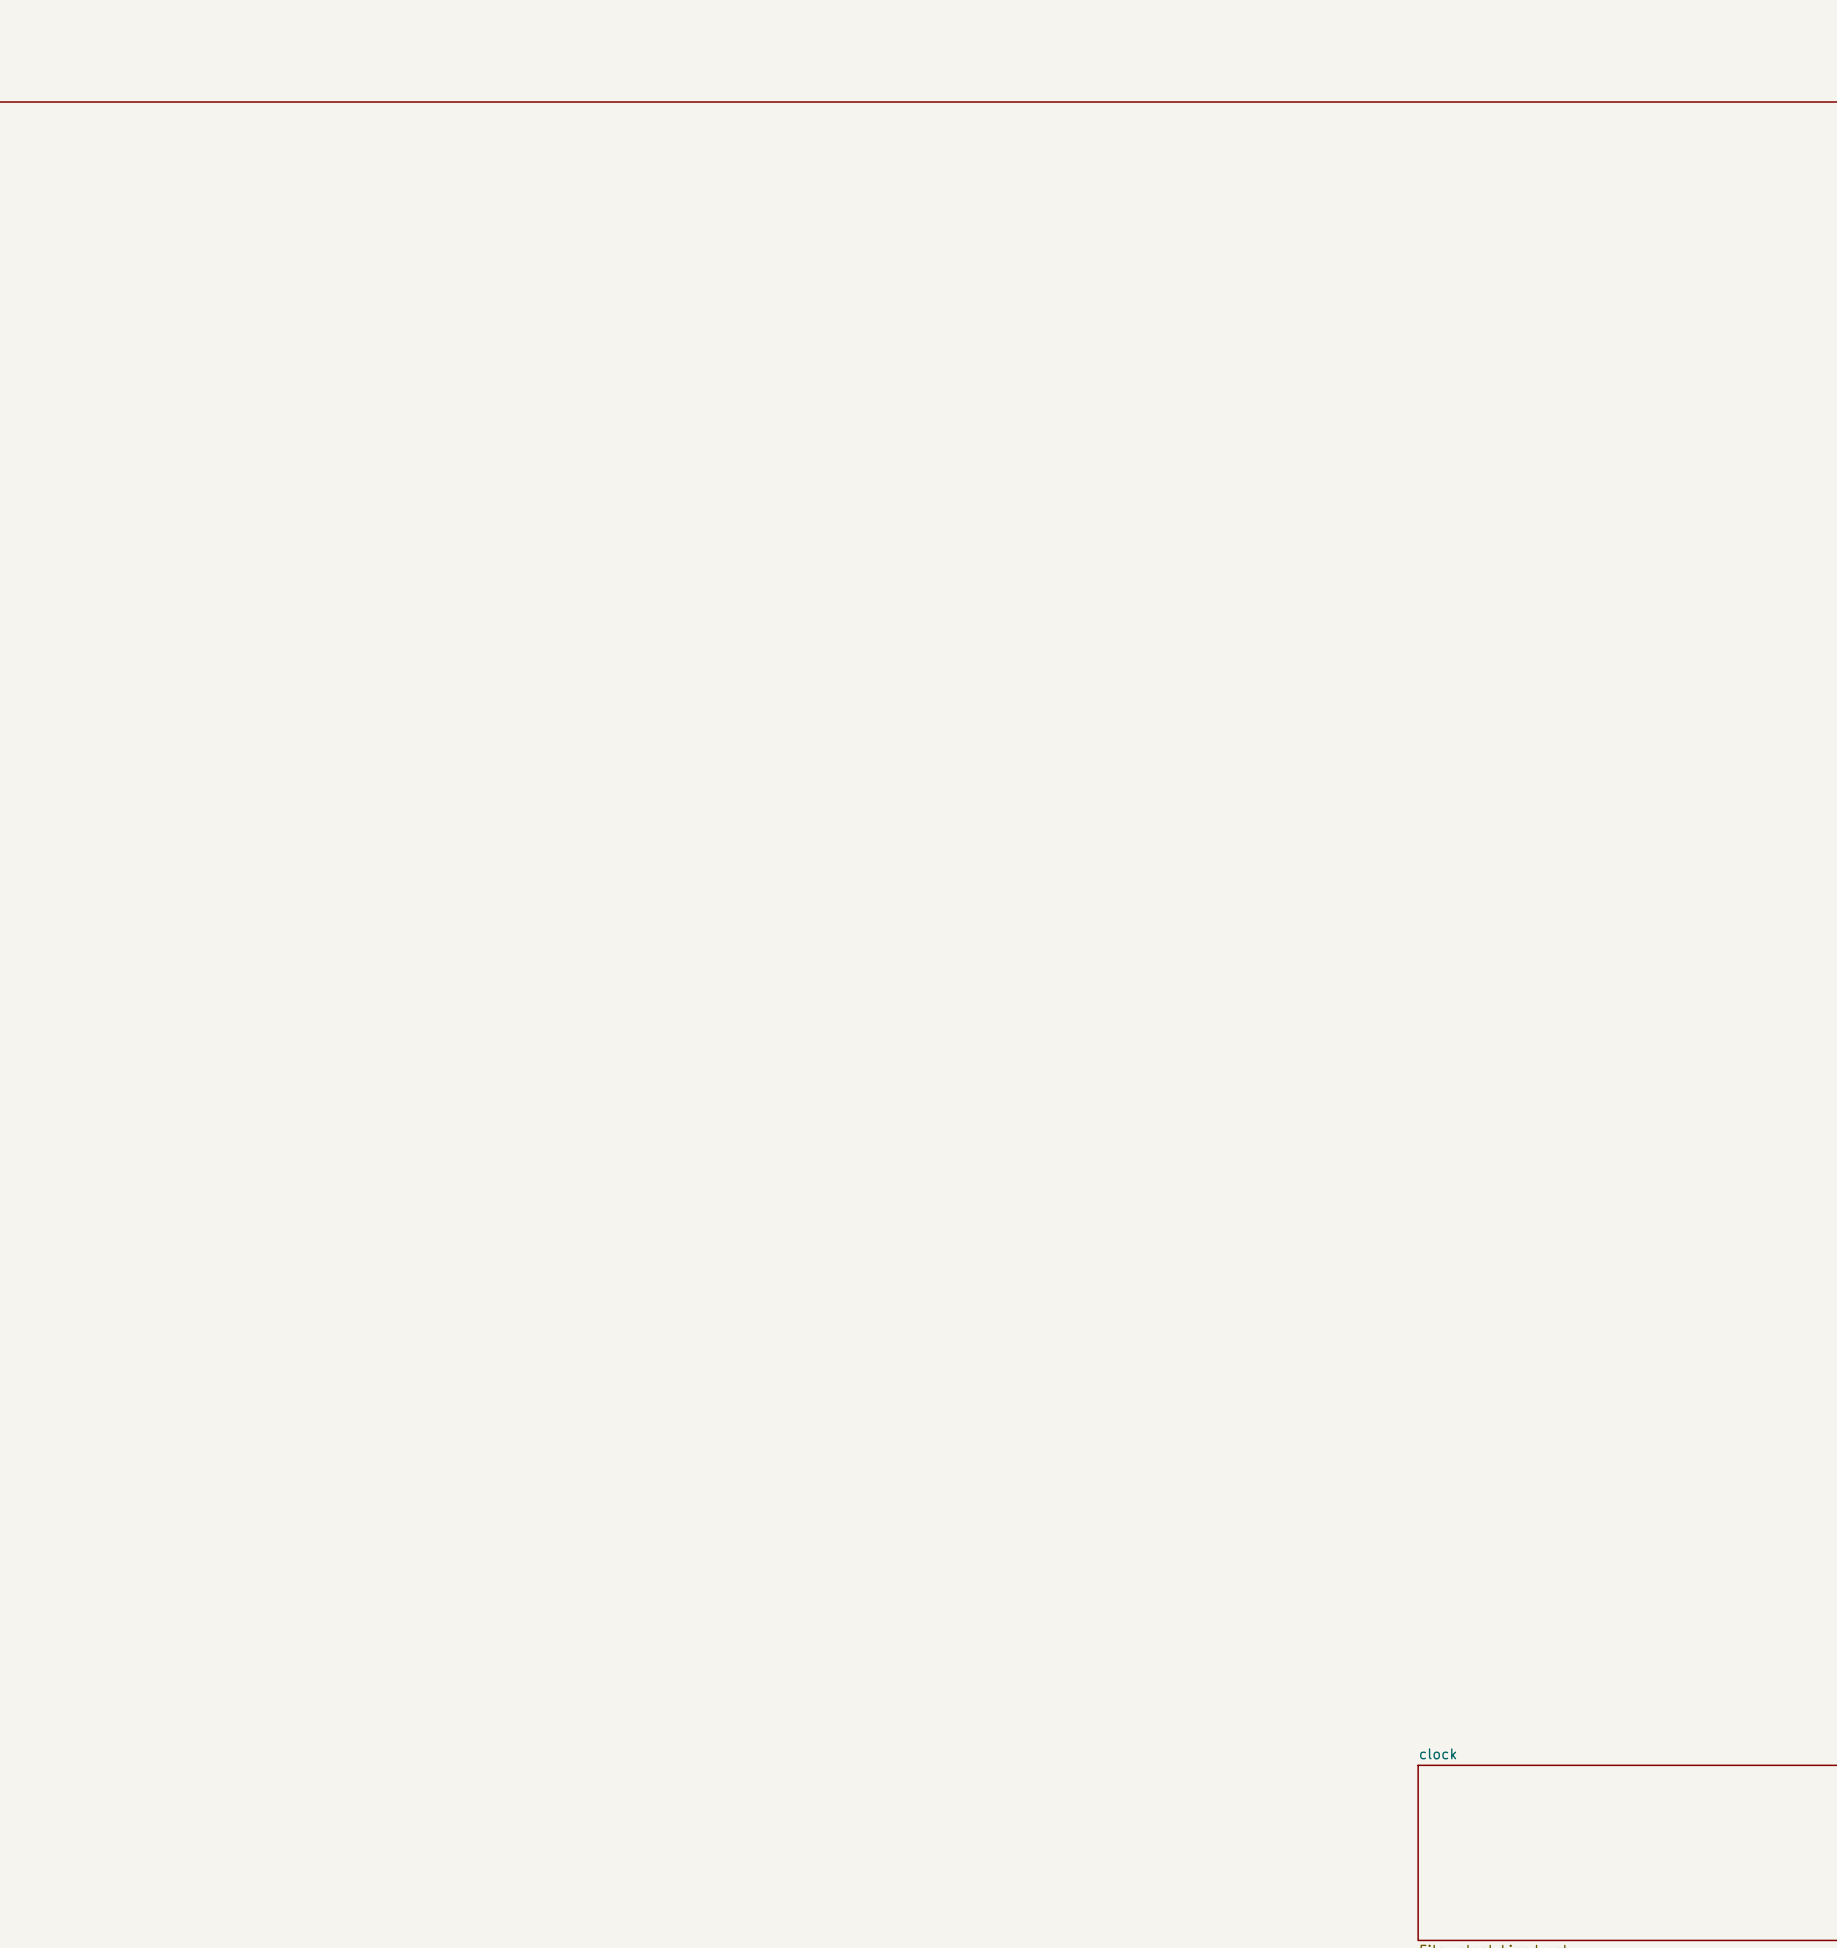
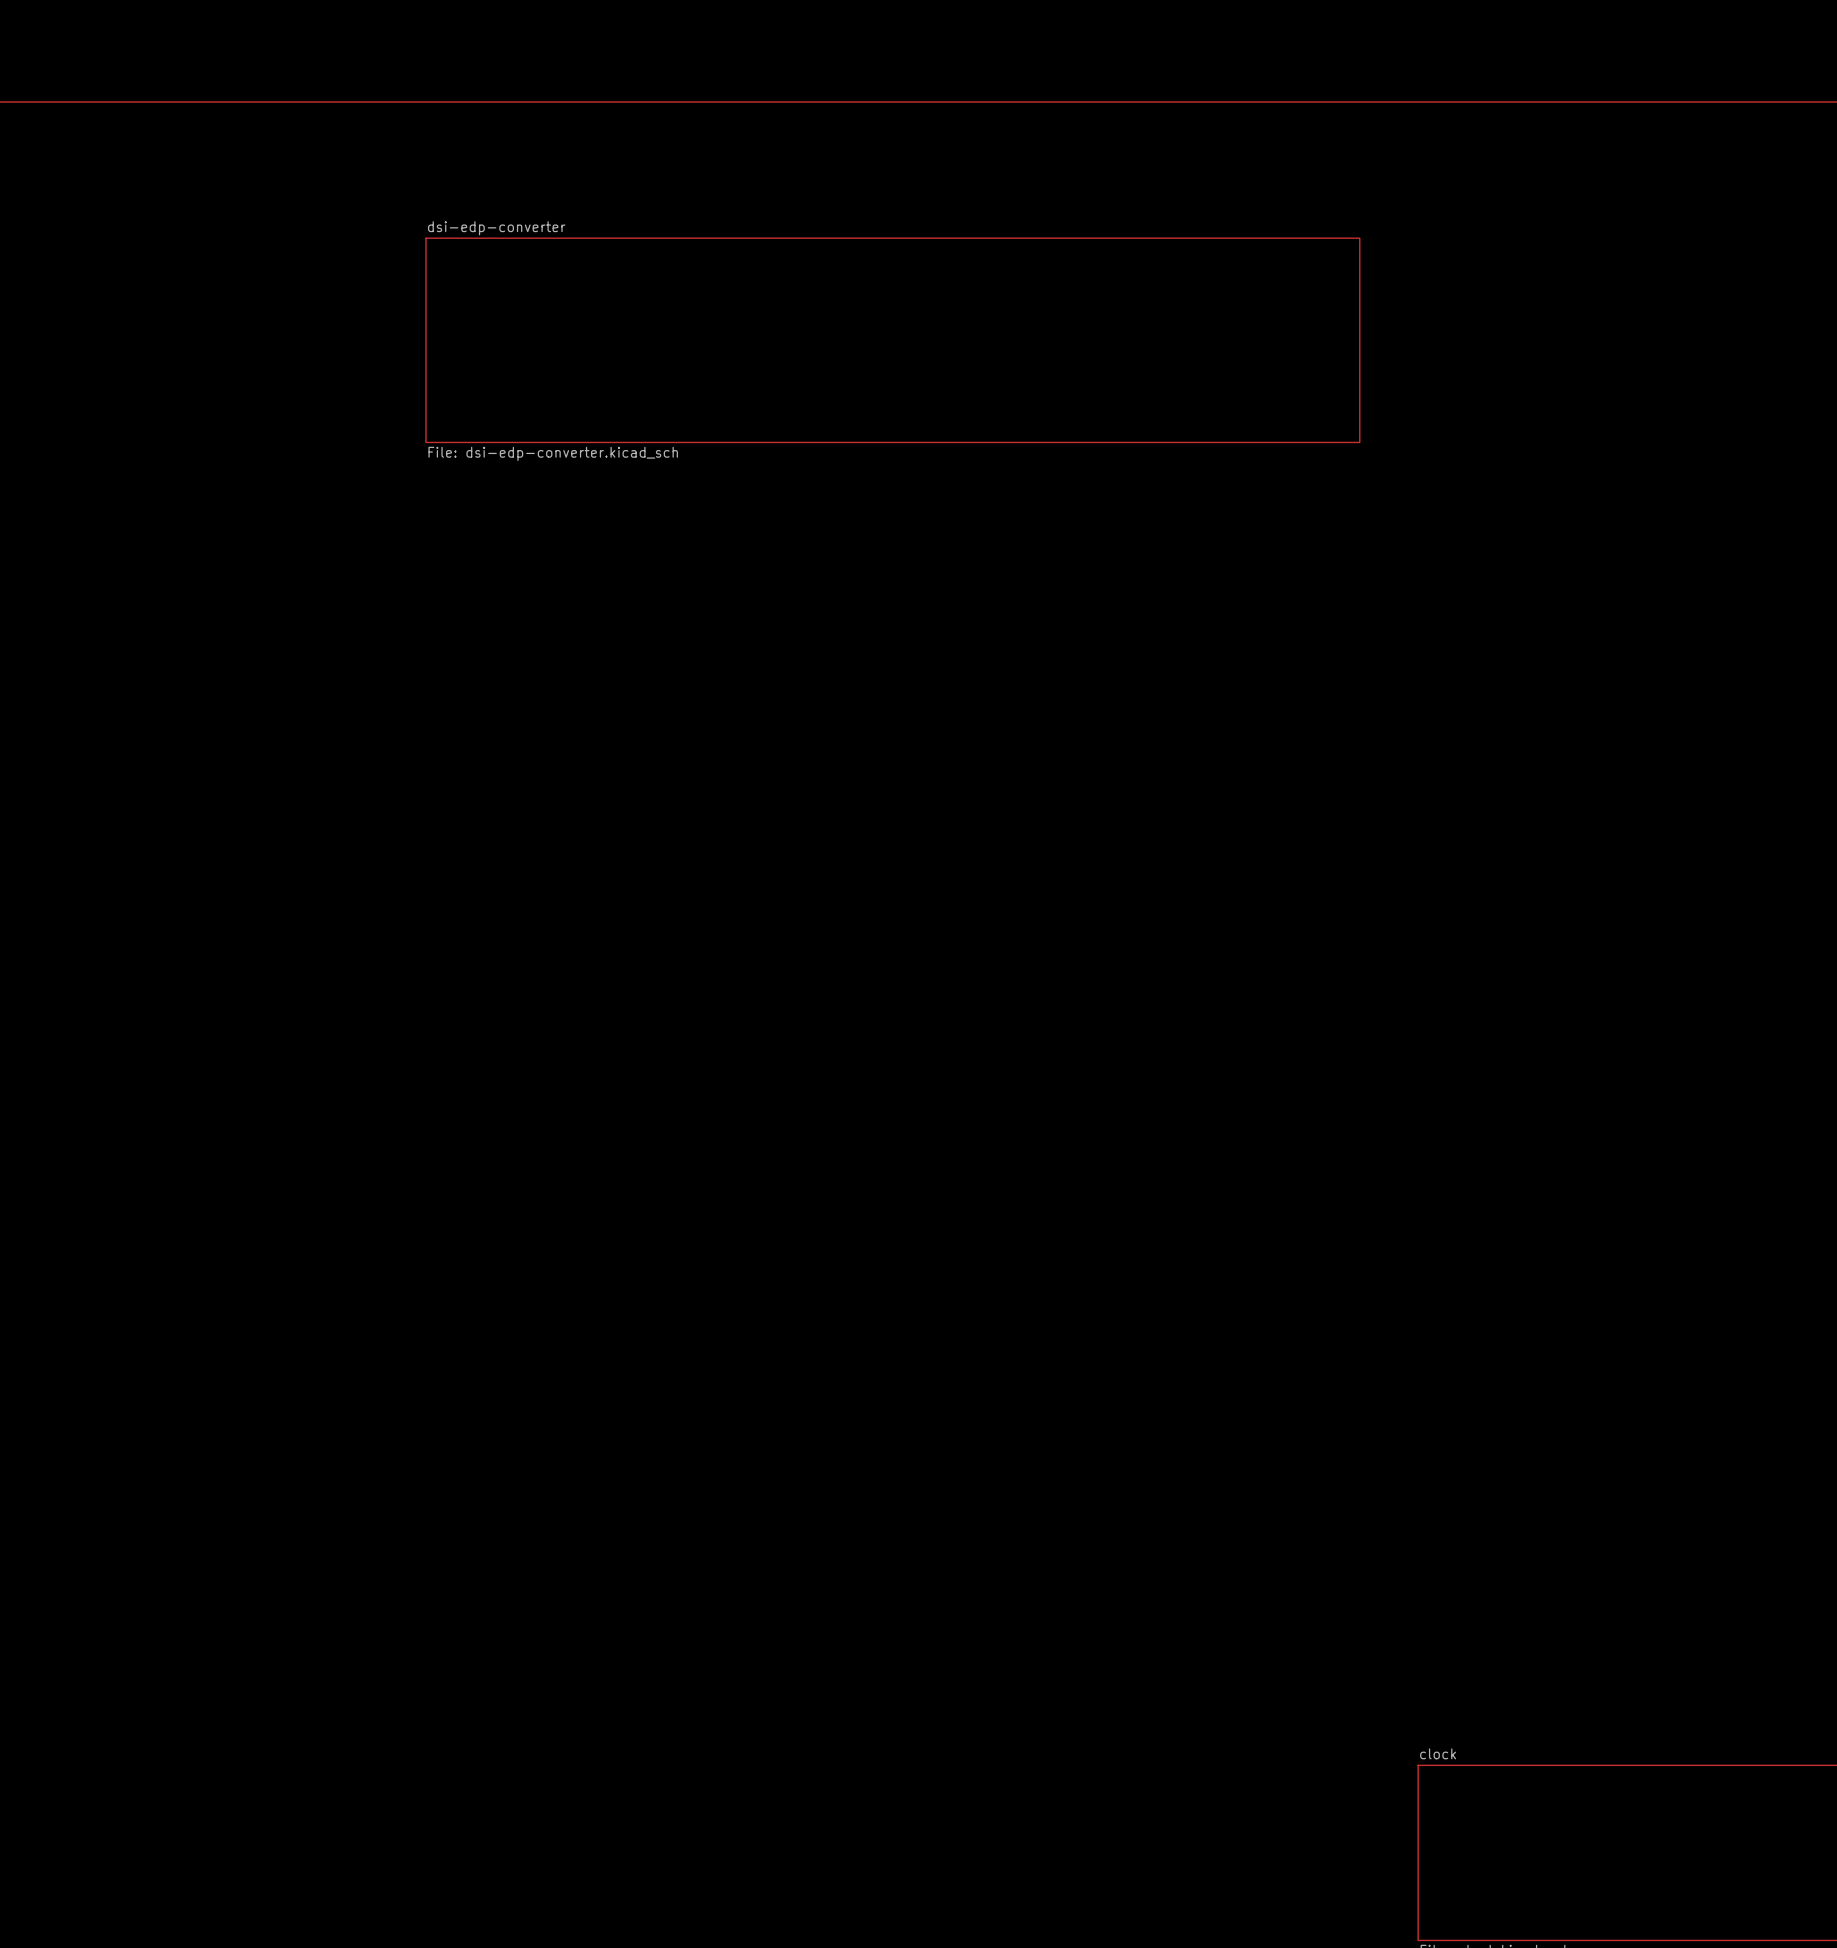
sheet dsi-edp-converter: none -> File: dsi-edp-converter.kicad_sch (892, 340)

